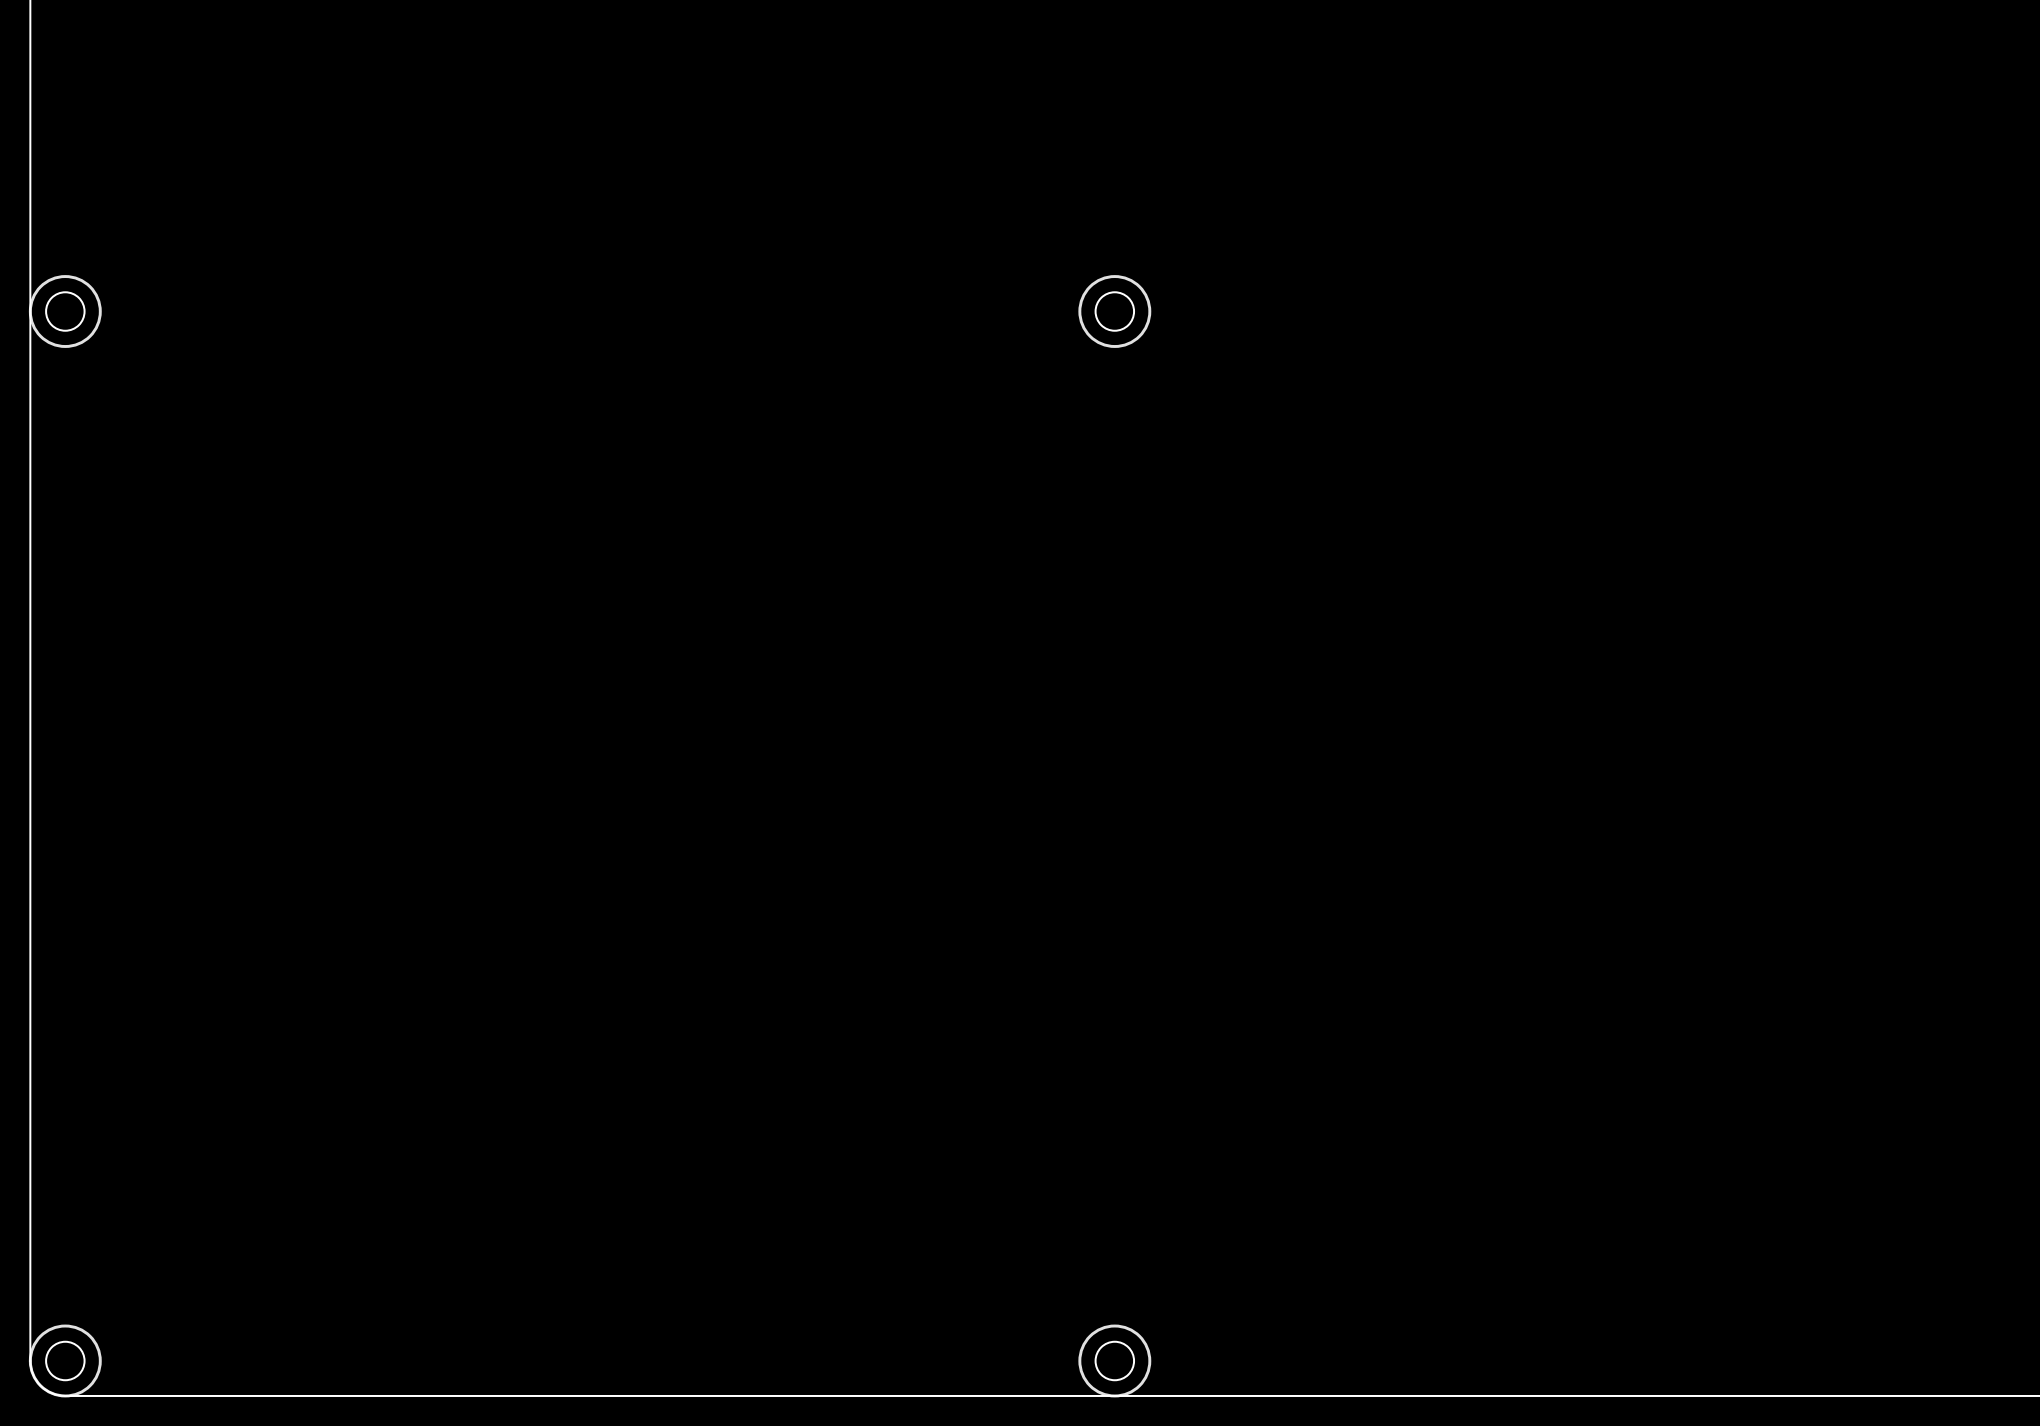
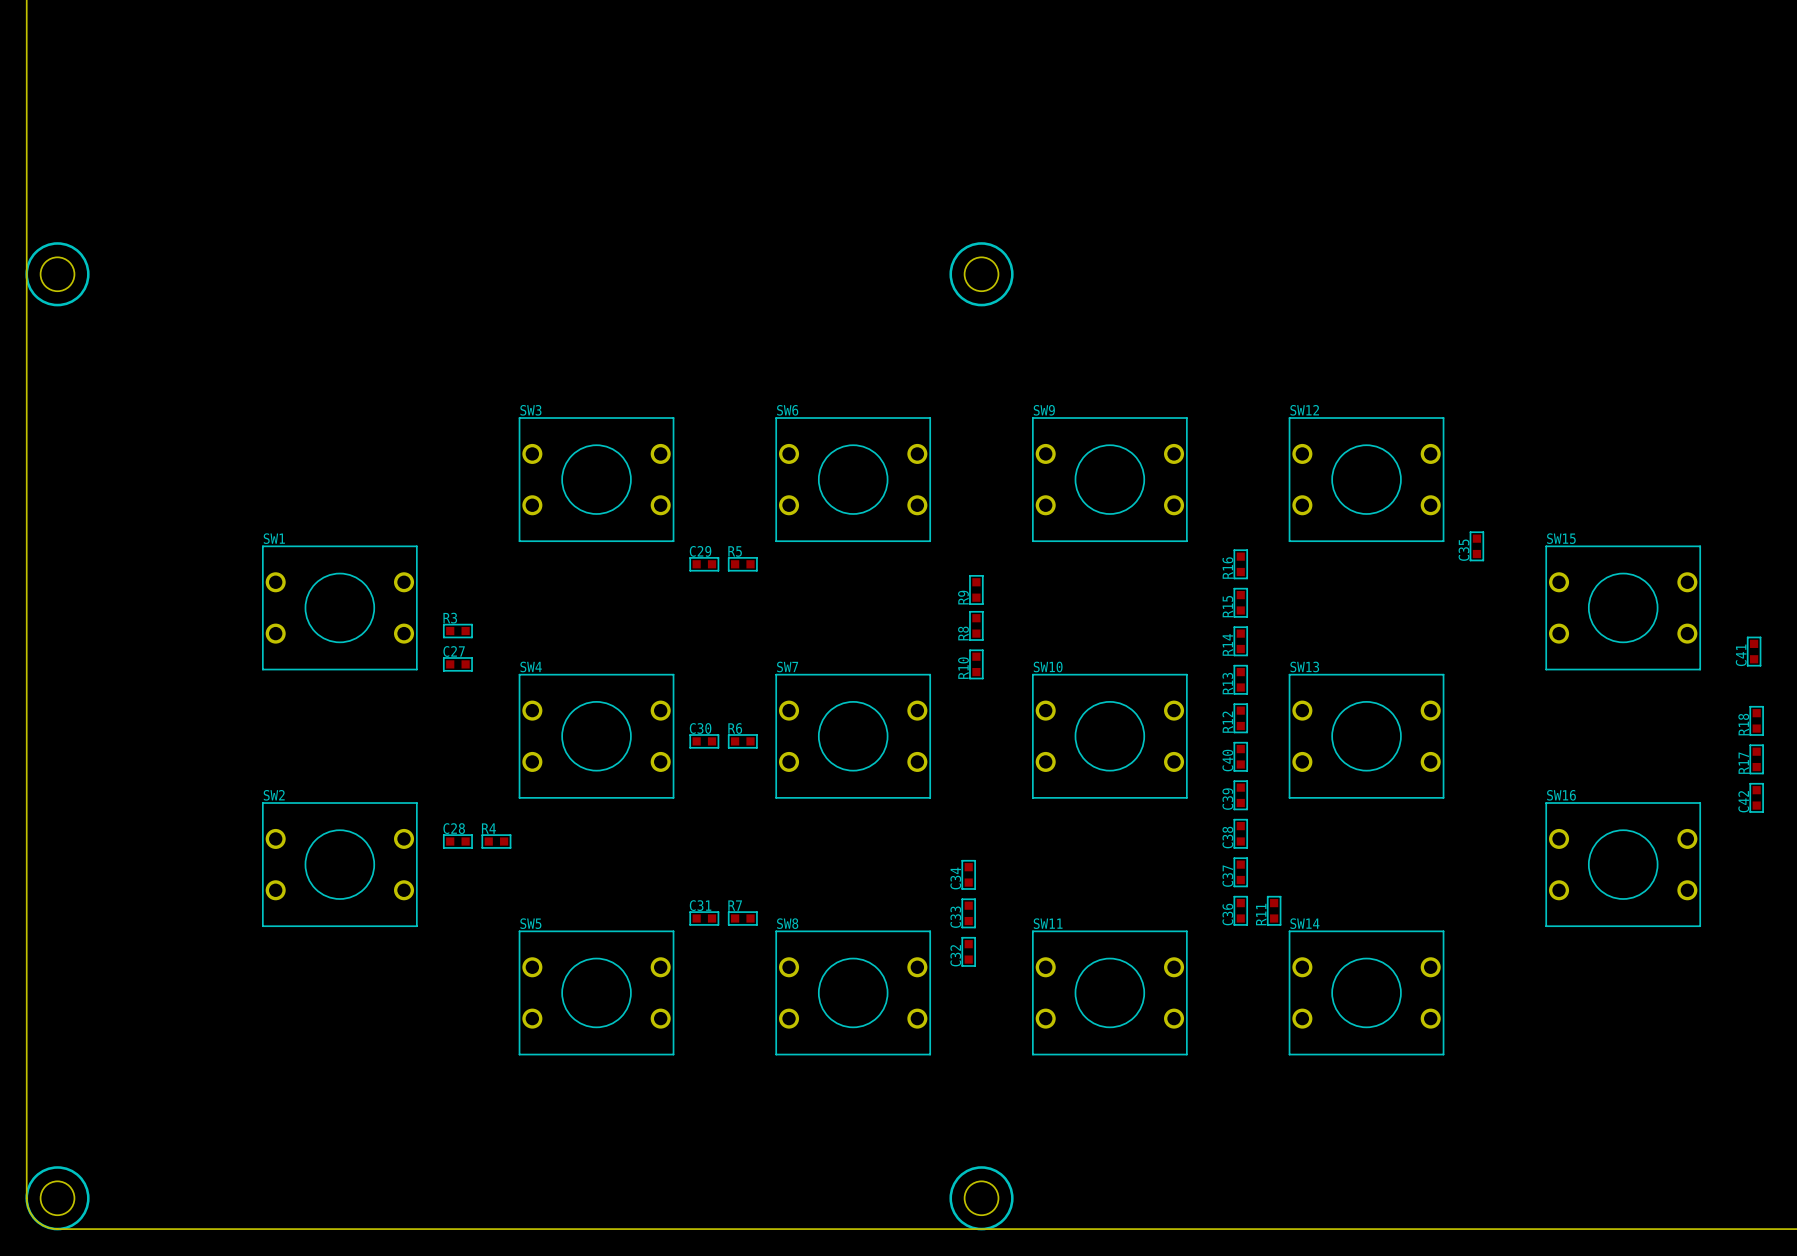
SW3: none -> (596, 479)
SW6: none -> (853, 479)
SW9: none -> (1109, 479)
SW12: none -> (1366, 479)
C35: none -> (1476, 546)
C29: none -> (704, 564)
R5: none -> (742, 564)
R16: none -> (1240, 564)
R9: none -> (976, 589)
R15: none -> (1240, 602)
SW1: none -> (339, 607)
SW15: none -> (1623, 607)
R8: none -> (976, 625)
R3: none -> (457, 631)
R14: none -> (1240, 641)
C41: none -> (1754, 651)
C27: none -> (457, 664)
R10: none -> (976, 664)
R13: none -> (1240, 679)
R12: none -> (1240, 718)
R18: none -> (1756, 720)
SW4: none -> (596, 736)
SW7: none -> (853, 736)
SW10: none -> (1109, 736)
SW13: none -> (1366, 736)
C30: none -> (704, 741)
R6: none -> (742, 741)
C40: none -> (1240, 756)
R17: none -> (1756, 759)
C39: none -> (1240, 795)
C42: none -> (1756, 797)
C38: none -> (1240, 833)
C28: none -> (457, 841)
R4: none -> (496, 841)
SW2: none -> (339, 864)
SW16: none -> (1623, 864)
C37: none -> (1240, 872)
C34: none -> (968, 874)
C36: none -> (1240, 910)
R11: none -> (1274, 910)
C33: none -> (968, 913)
C31: none -> (704, 918)
R7: none -> (742, 918)
C32: none -> (968, 951)
SW5: none -> (596, 992)
SW8: none -> (853, 992)
SW11: none -> (1109, 992)
SW14: none -> (1366, 992)

